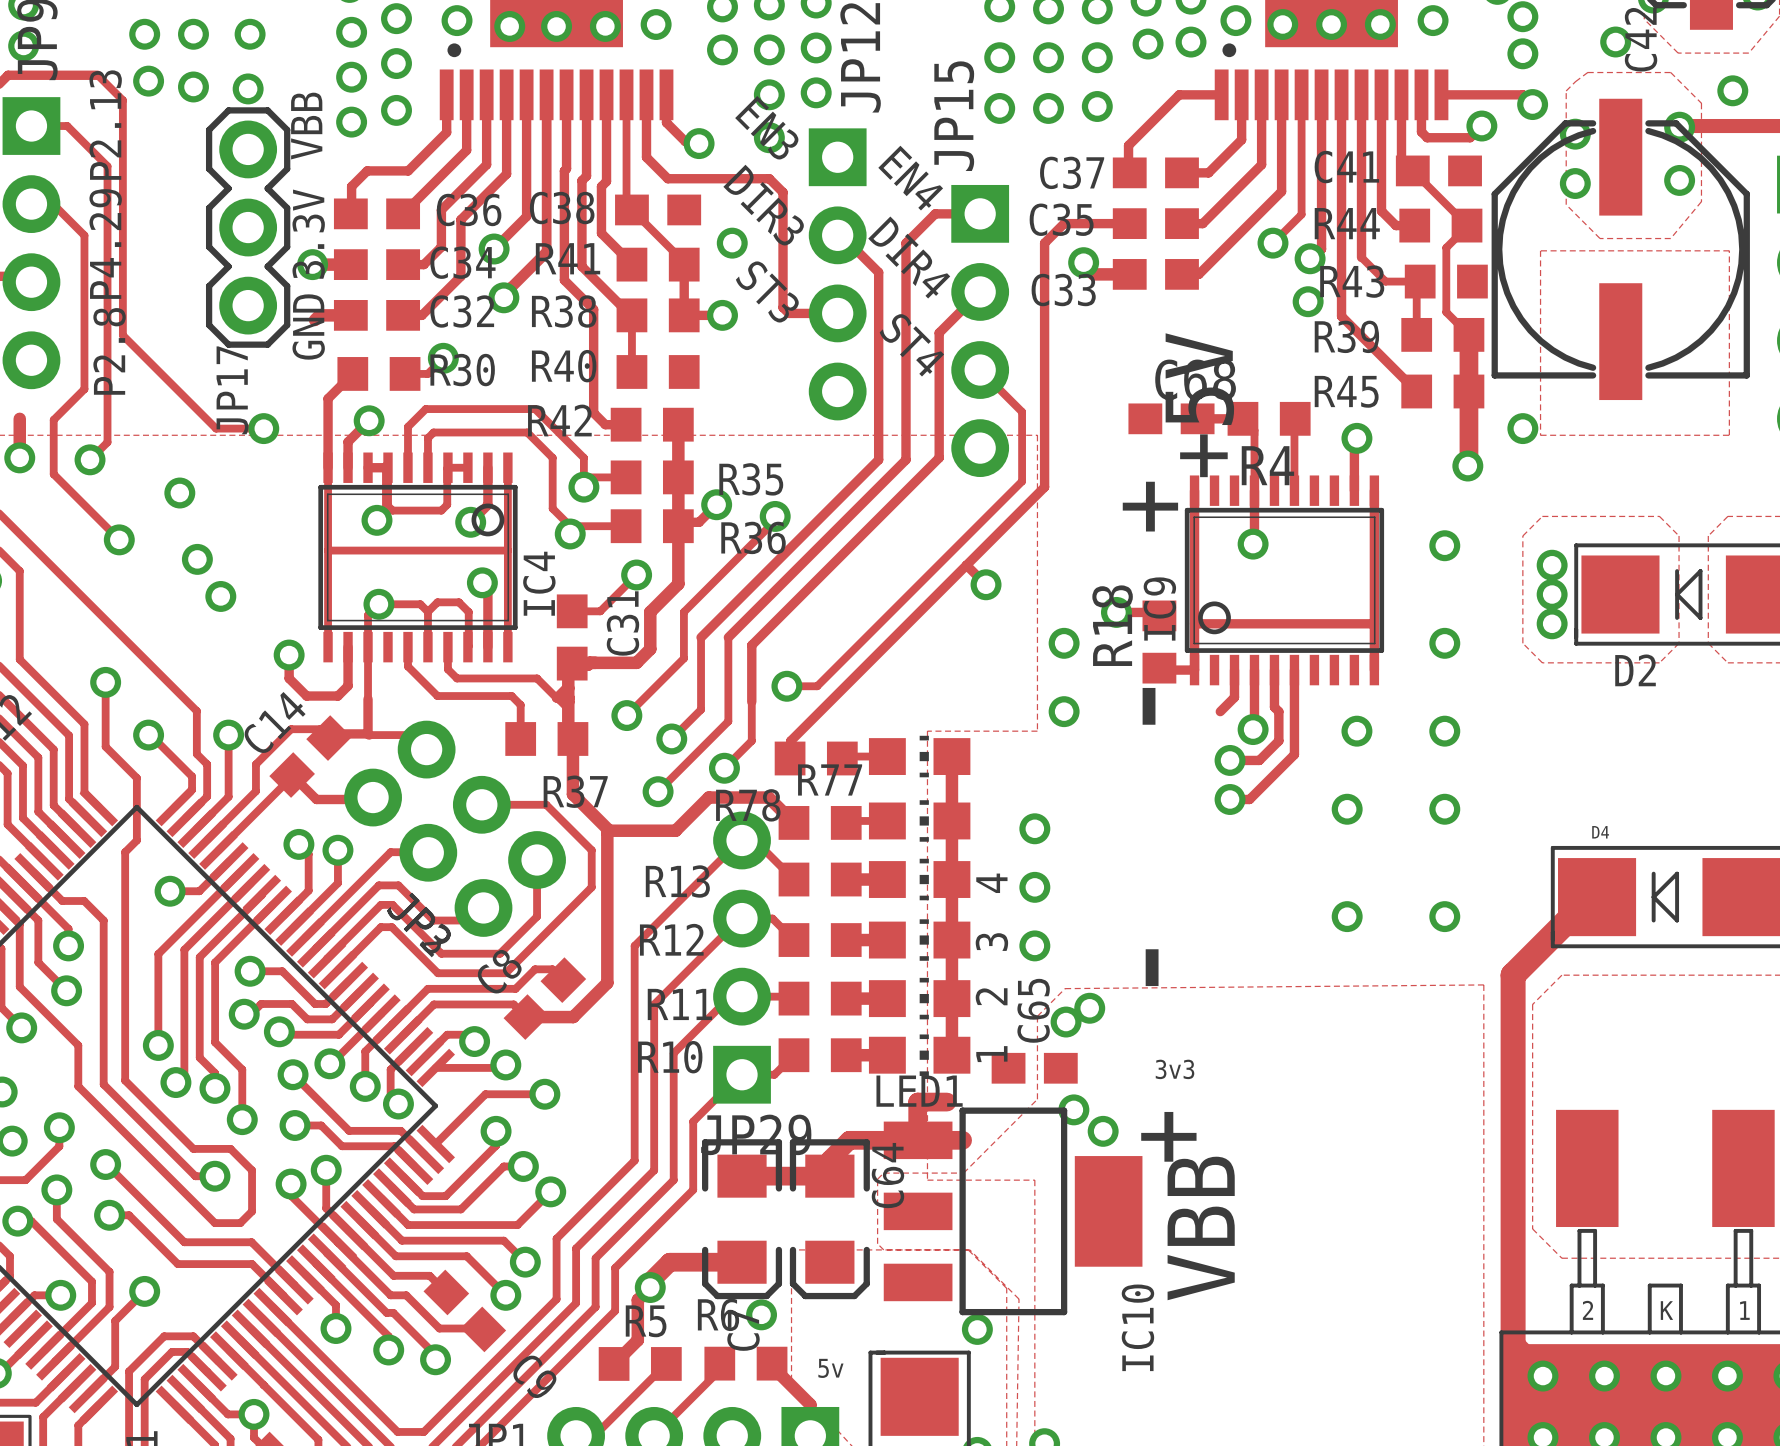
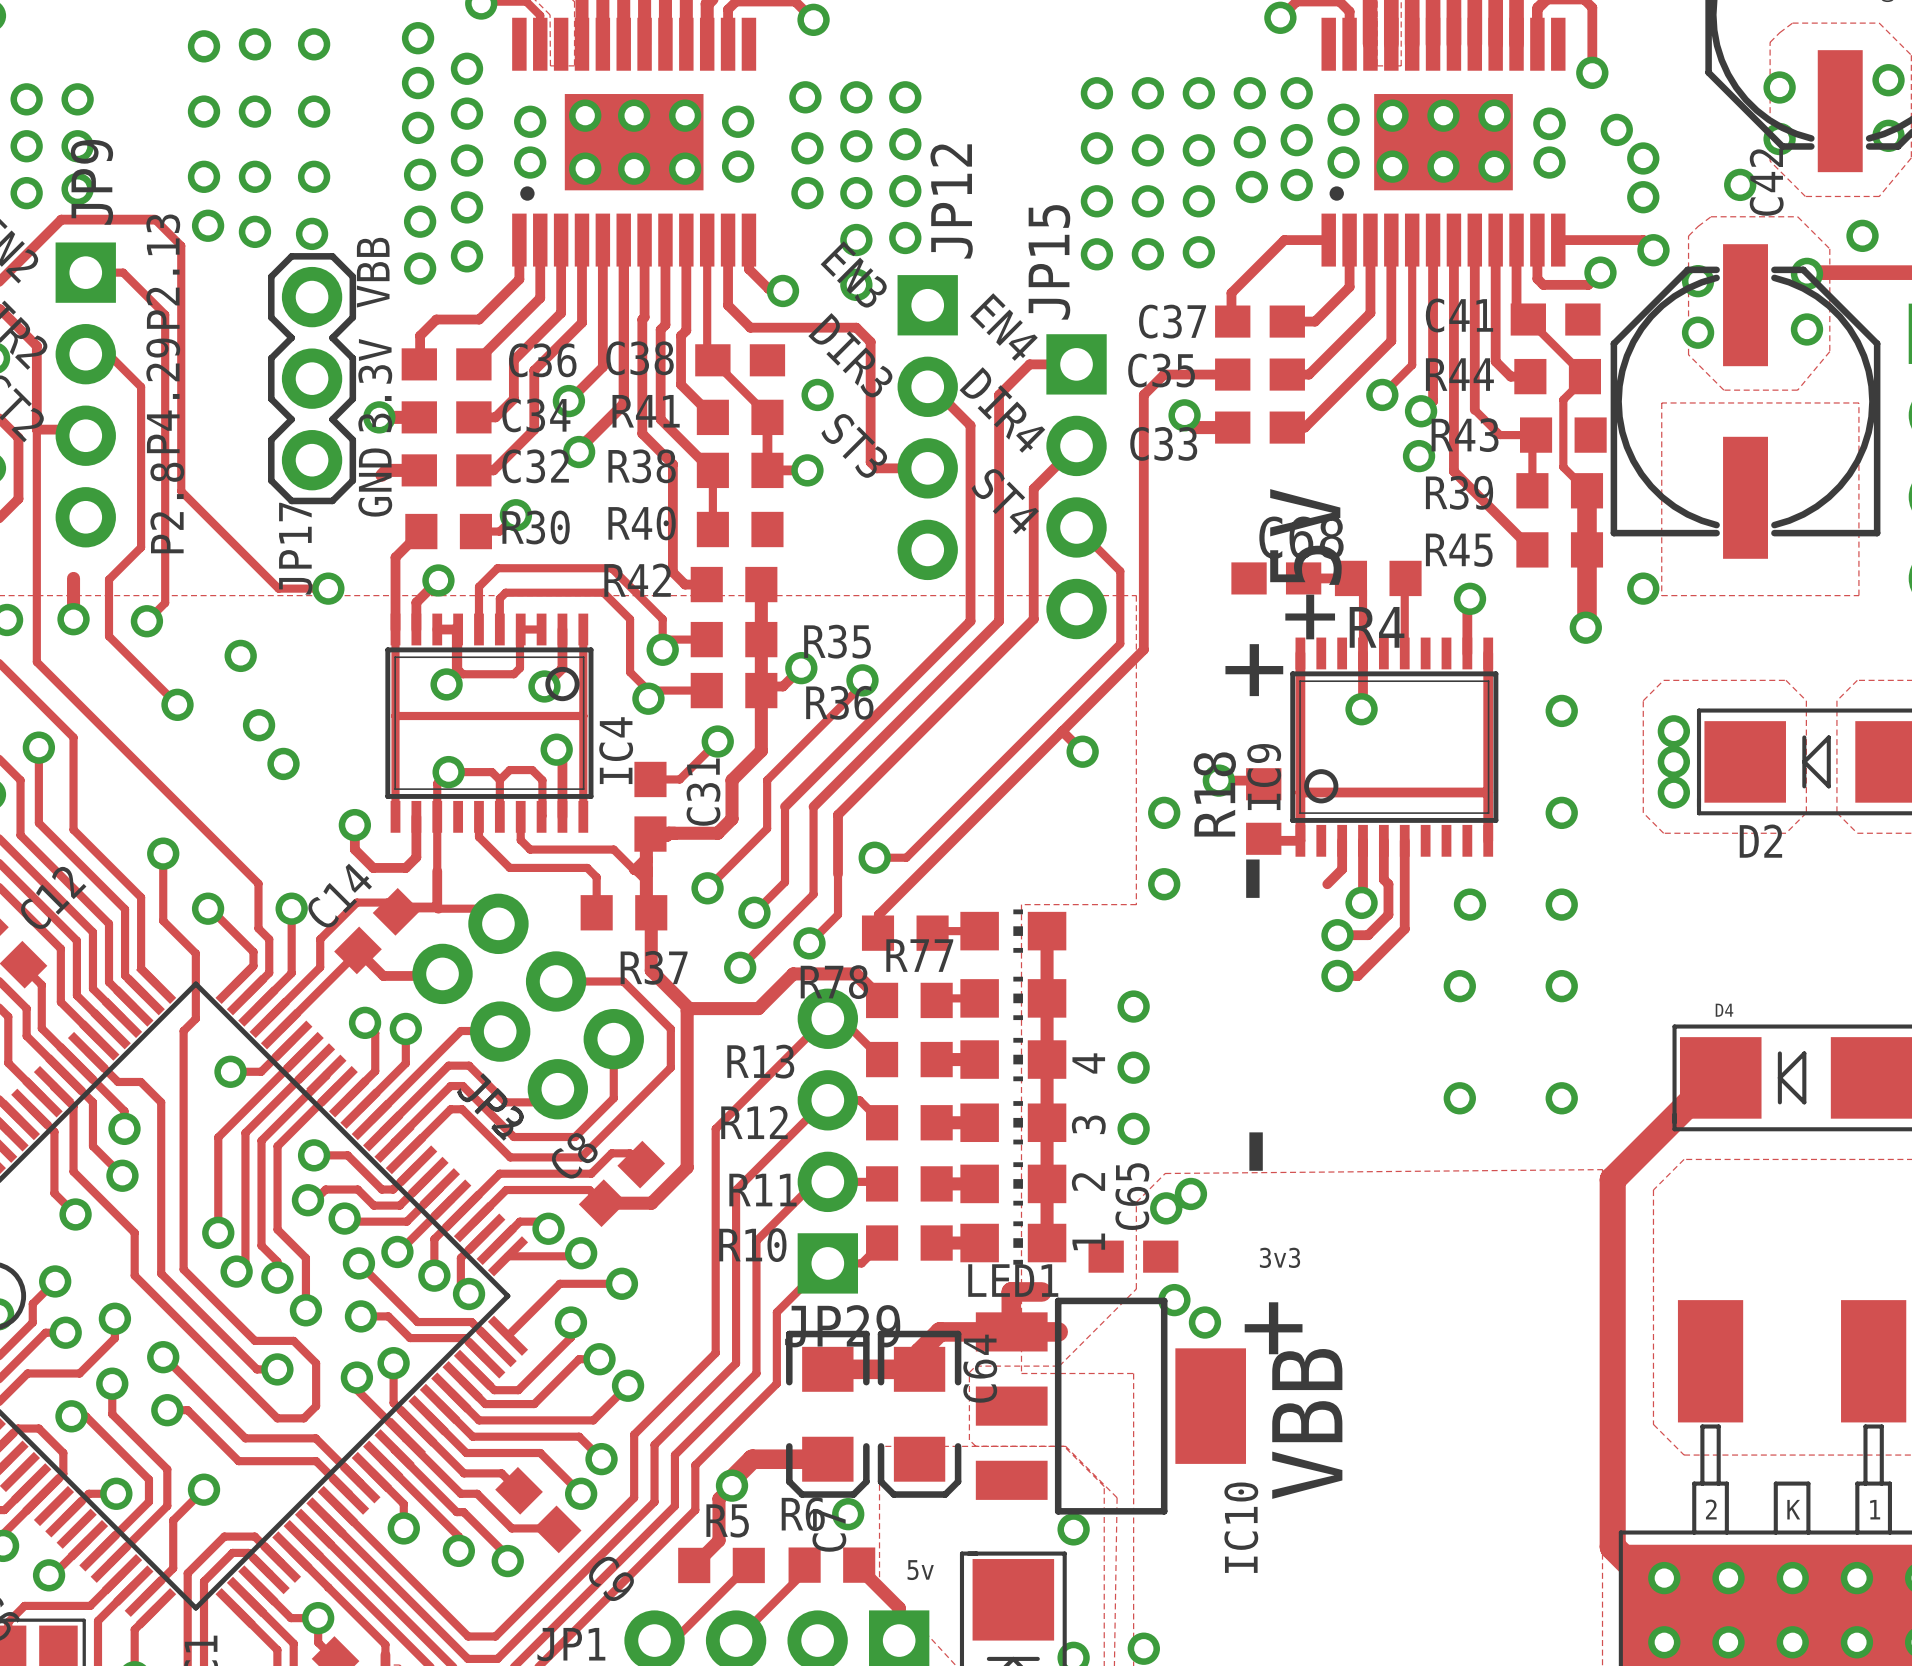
track: (1513, 975) (1513, 1346) (1543, 1376) -> (1633, 1159) (1612, 1179) (1612, 1546) (1643, 1578) (1664, 1578)

